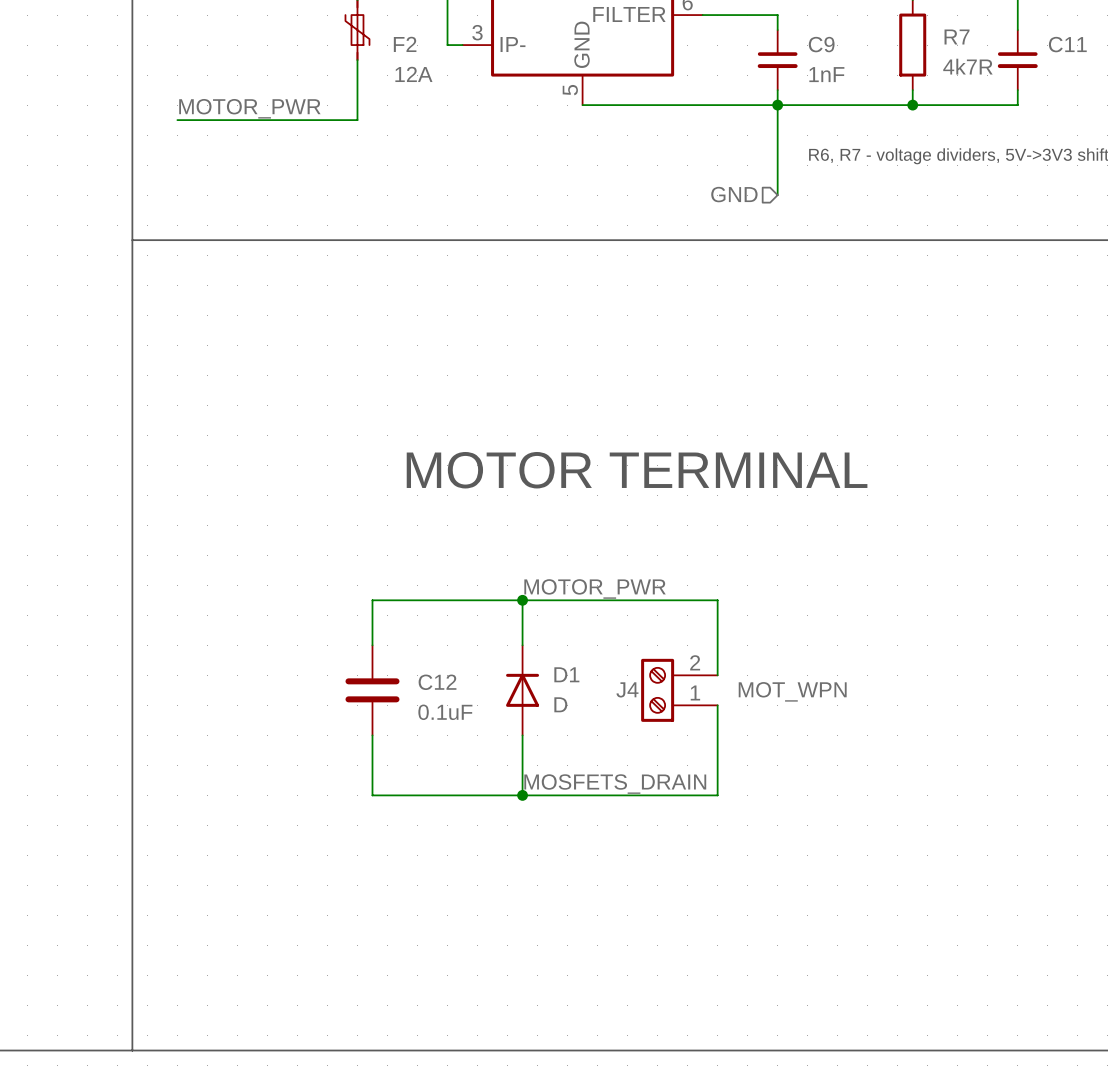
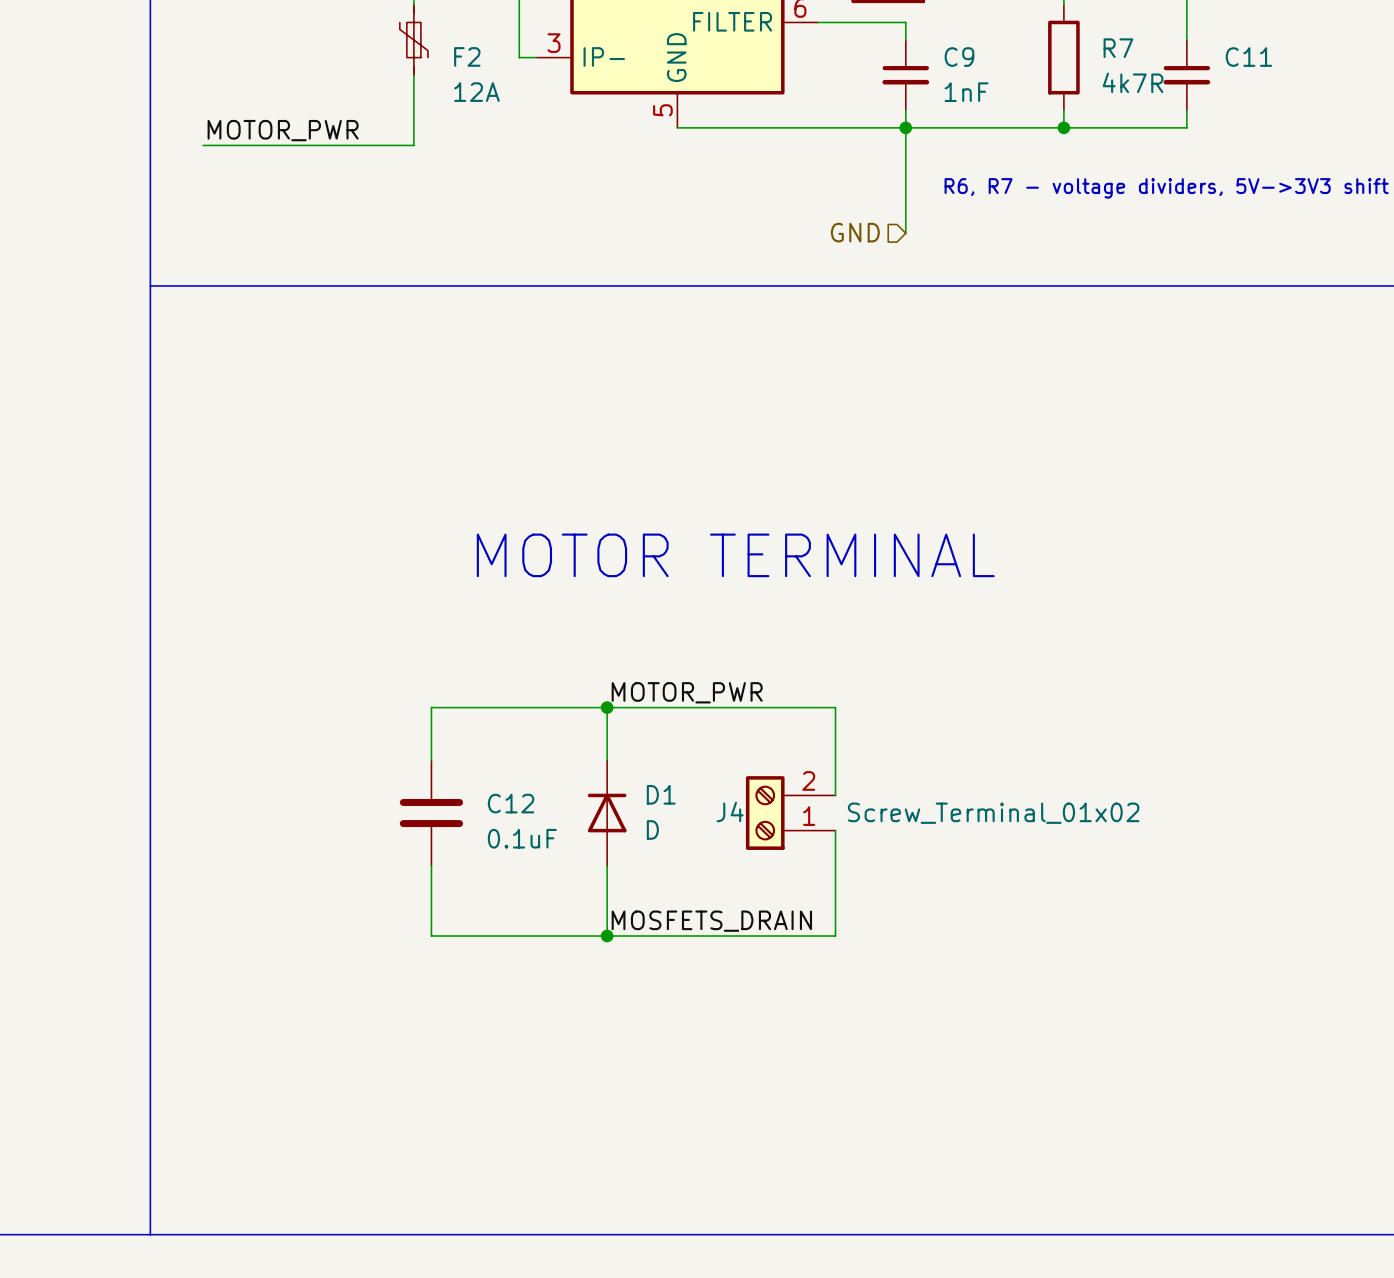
J4 value: MOT_WPN (792, 691) -> Screw_Terminal_01x02 (993, 813)

